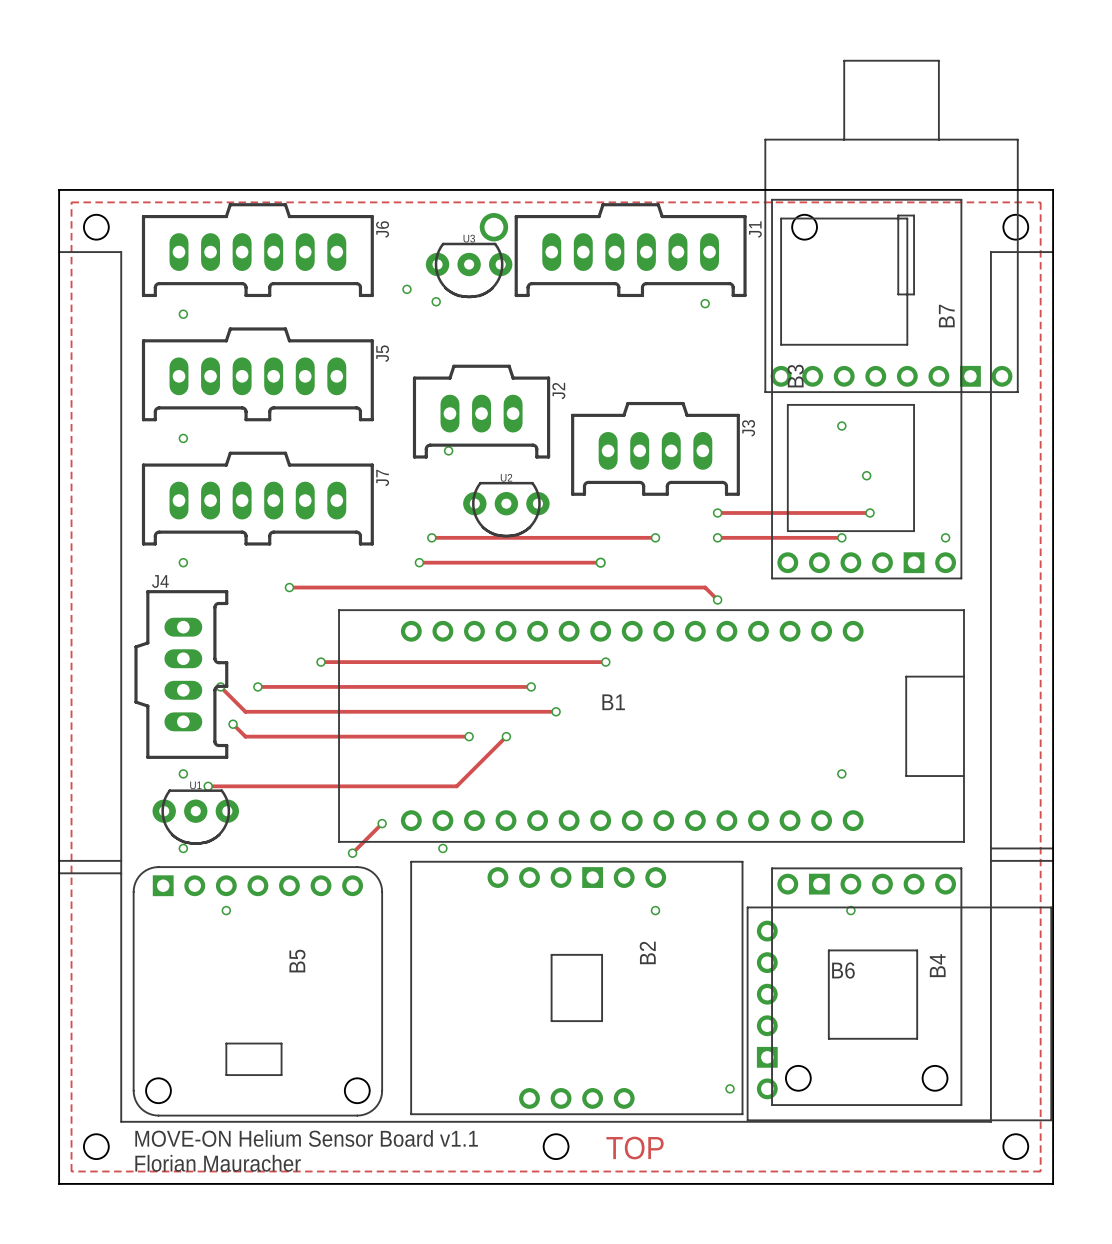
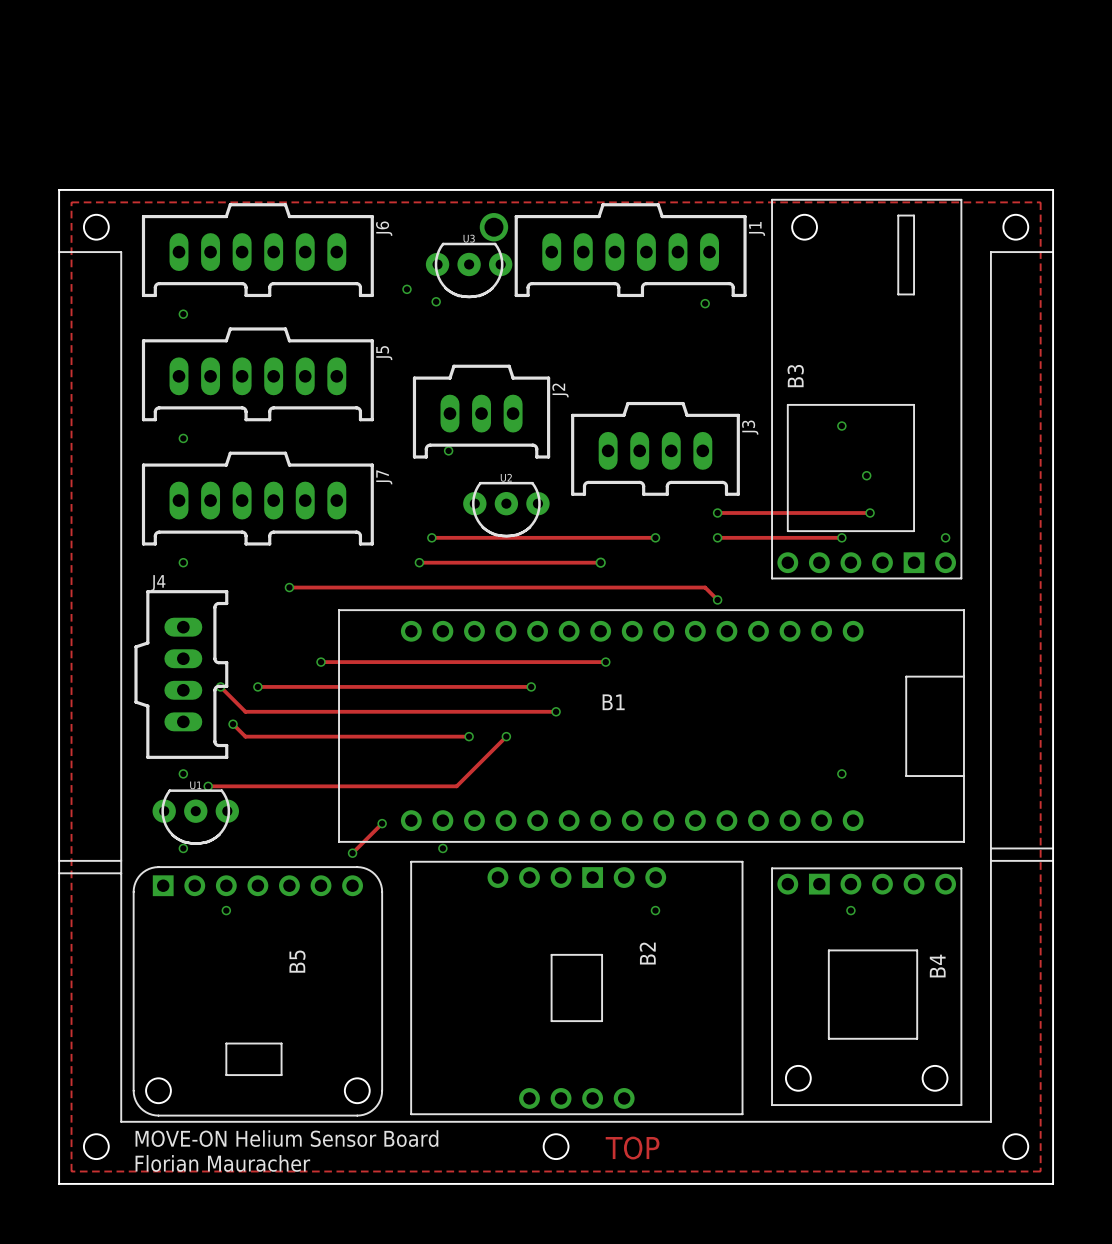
B7: (891, 226) -> none
B6: (899, 1013) -> none
via: (730, 1088) -> none
text: MOVE-ON Helium Sensor Board v1.1 (306, 1138) -> MOVE-ON Helium Sensor Board (286, 1138)

